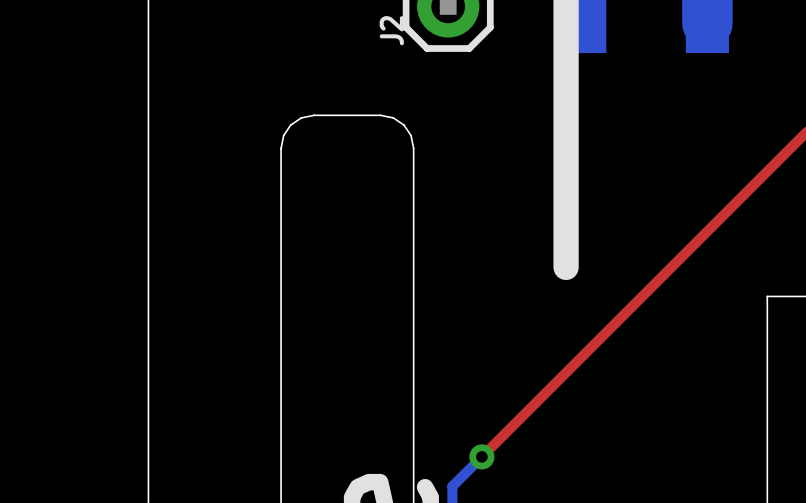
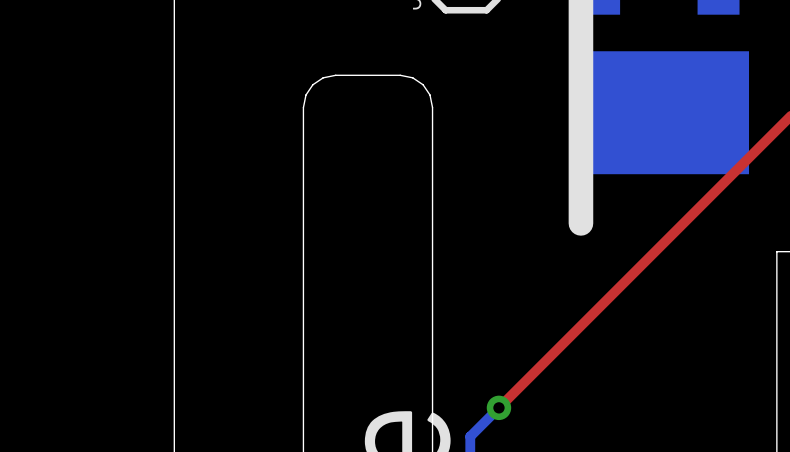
part: none -> (667, 112)

